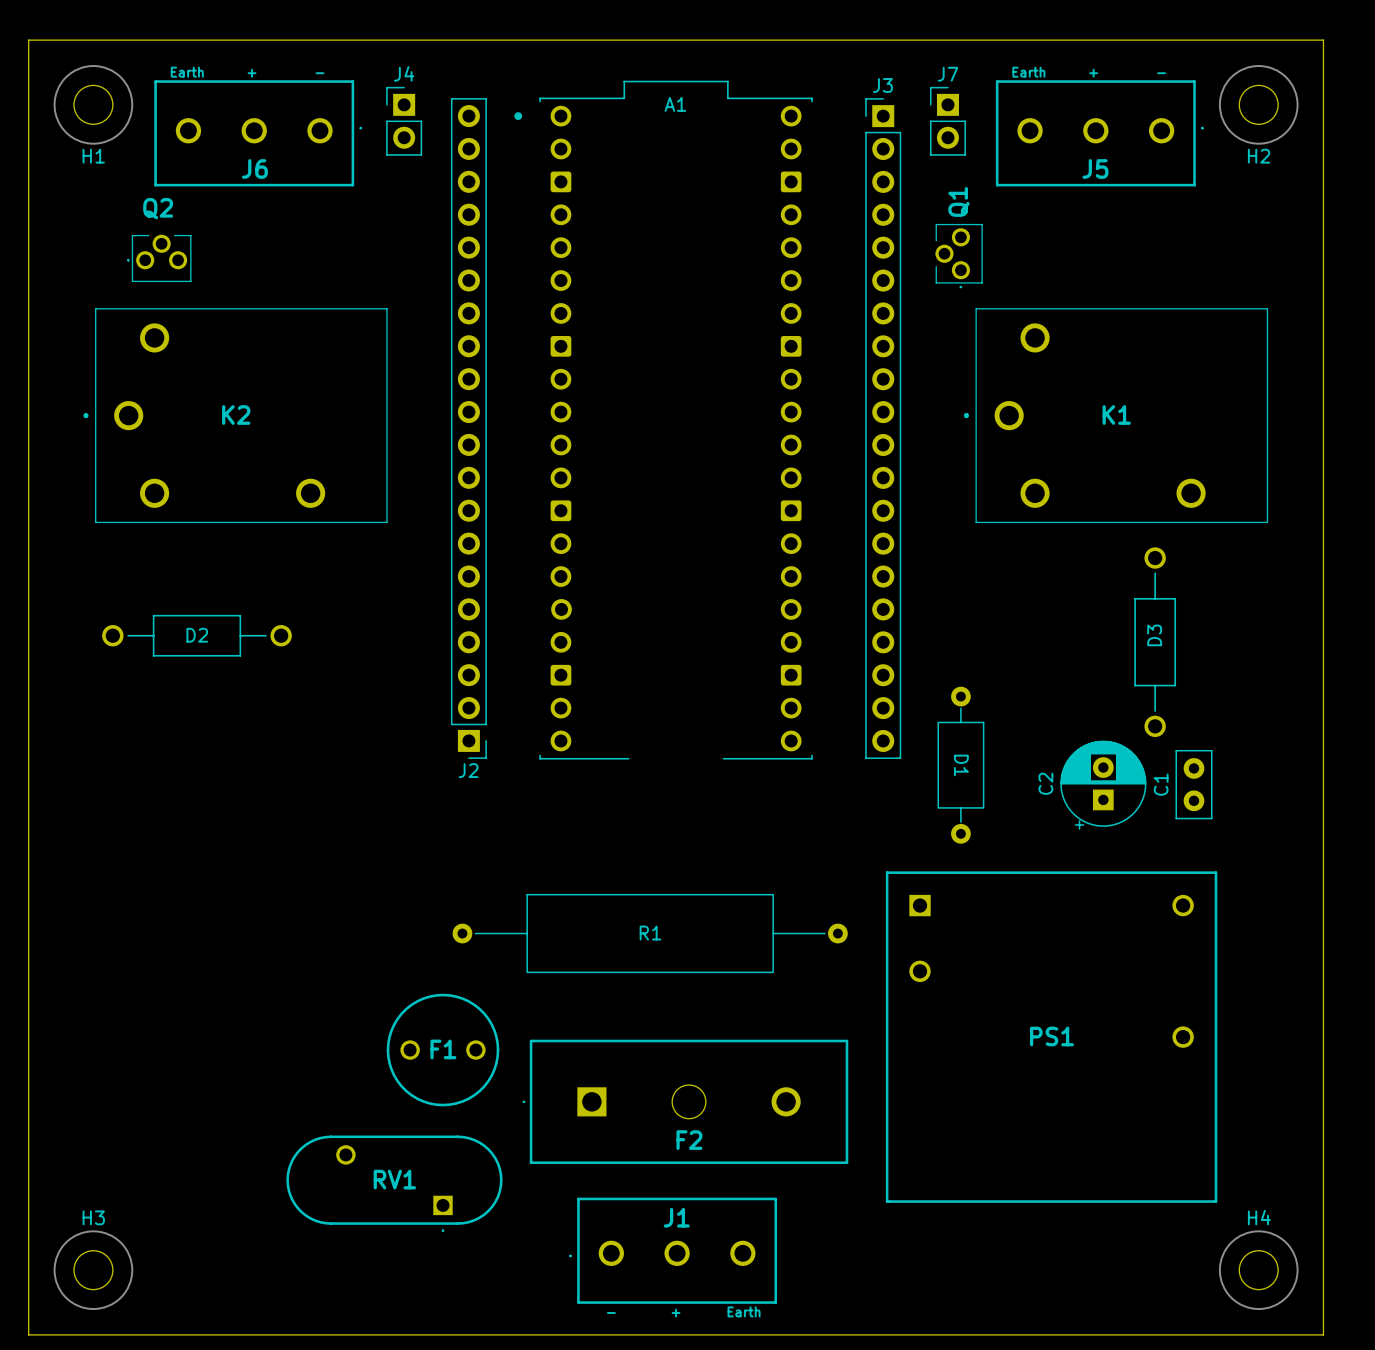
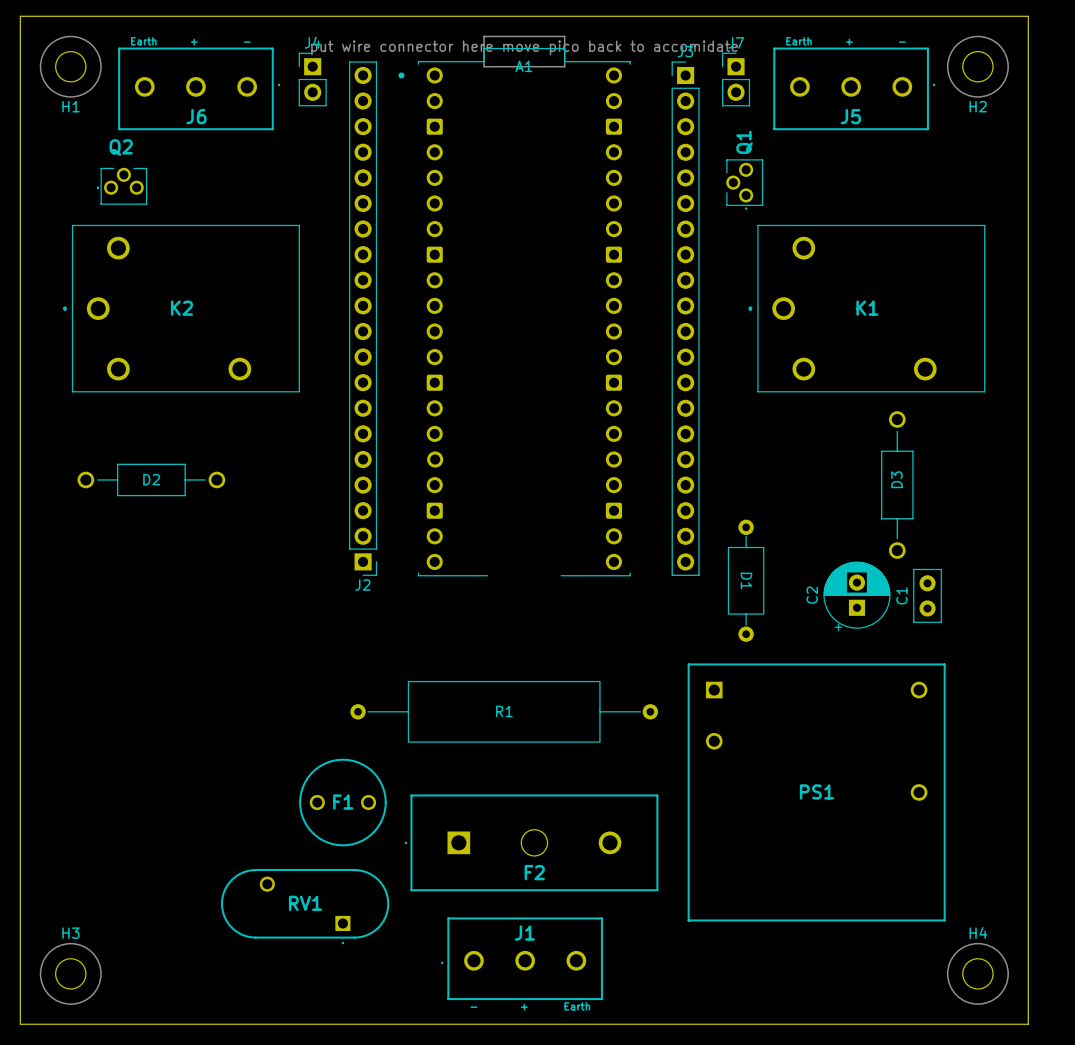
line: none -> (484, 36) (564, 36) (564, 66) (484, 66) (484, 36)
text: none -> put wire connector here move pico back to accomidate (524, 47)

